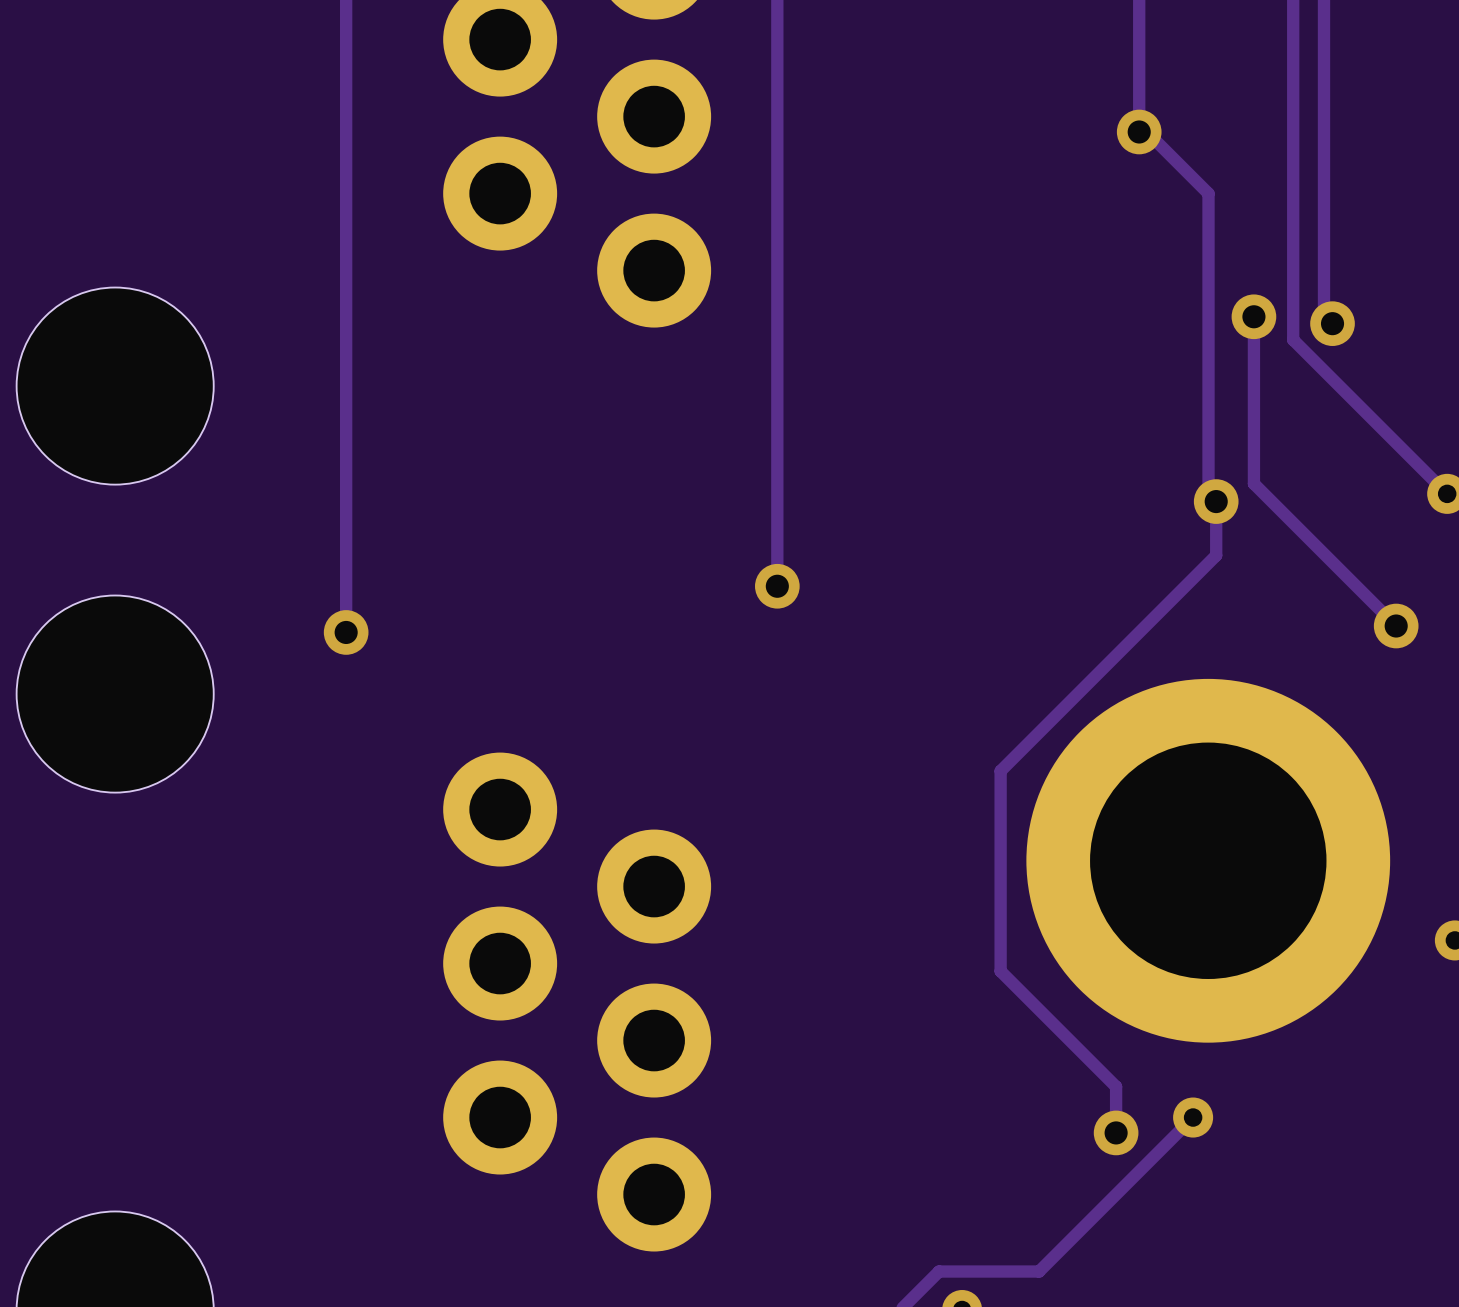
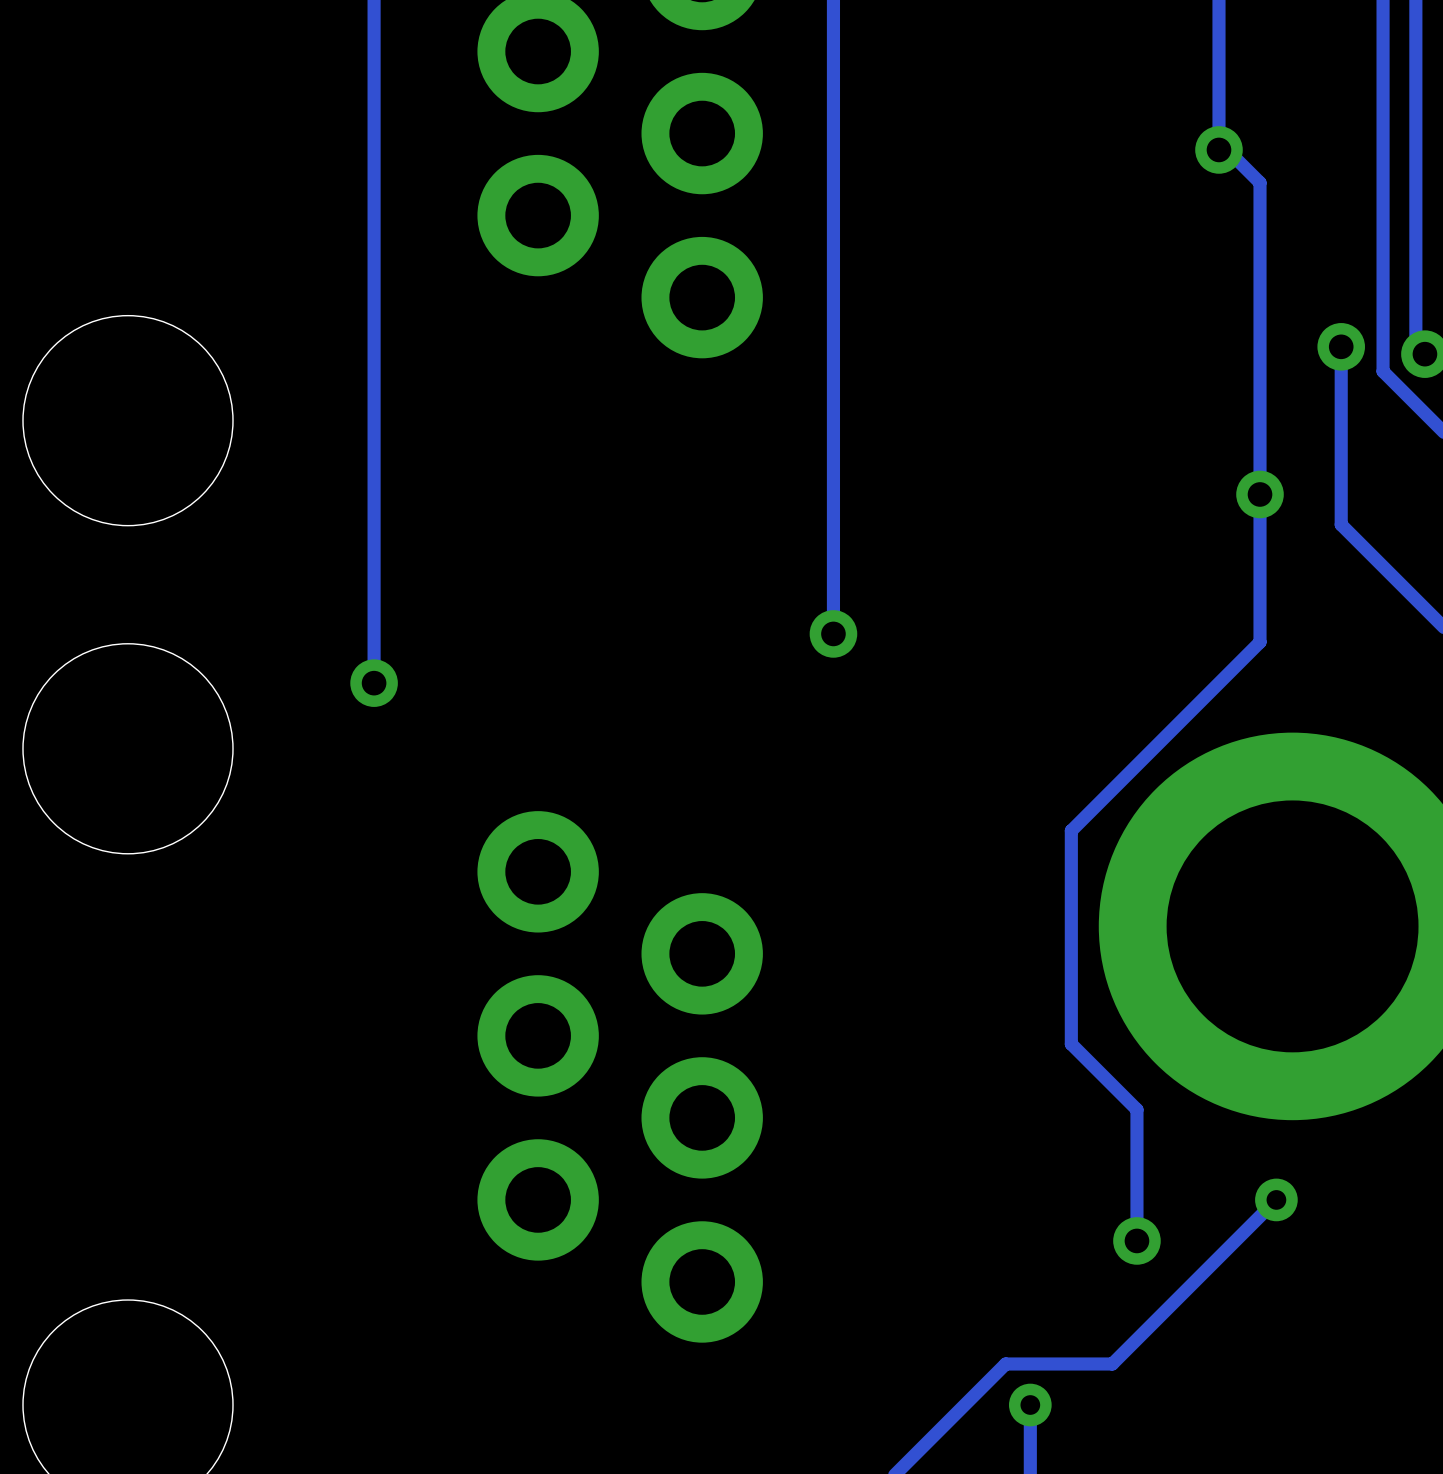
track: (1177, 162) (1208, 193) (1208, 493) (1216, 501) (1216, 555) (1177, 593) -> (1260, 182) (1260, 642)
via position: (1216, 501) -> (1260, 494)
track: (1062, 1032) (1116, 1086) (1116, 1132) -> (1136, 1109) (1136, 1240)
via position: (1116, 1132) -> (1136, 1240)

